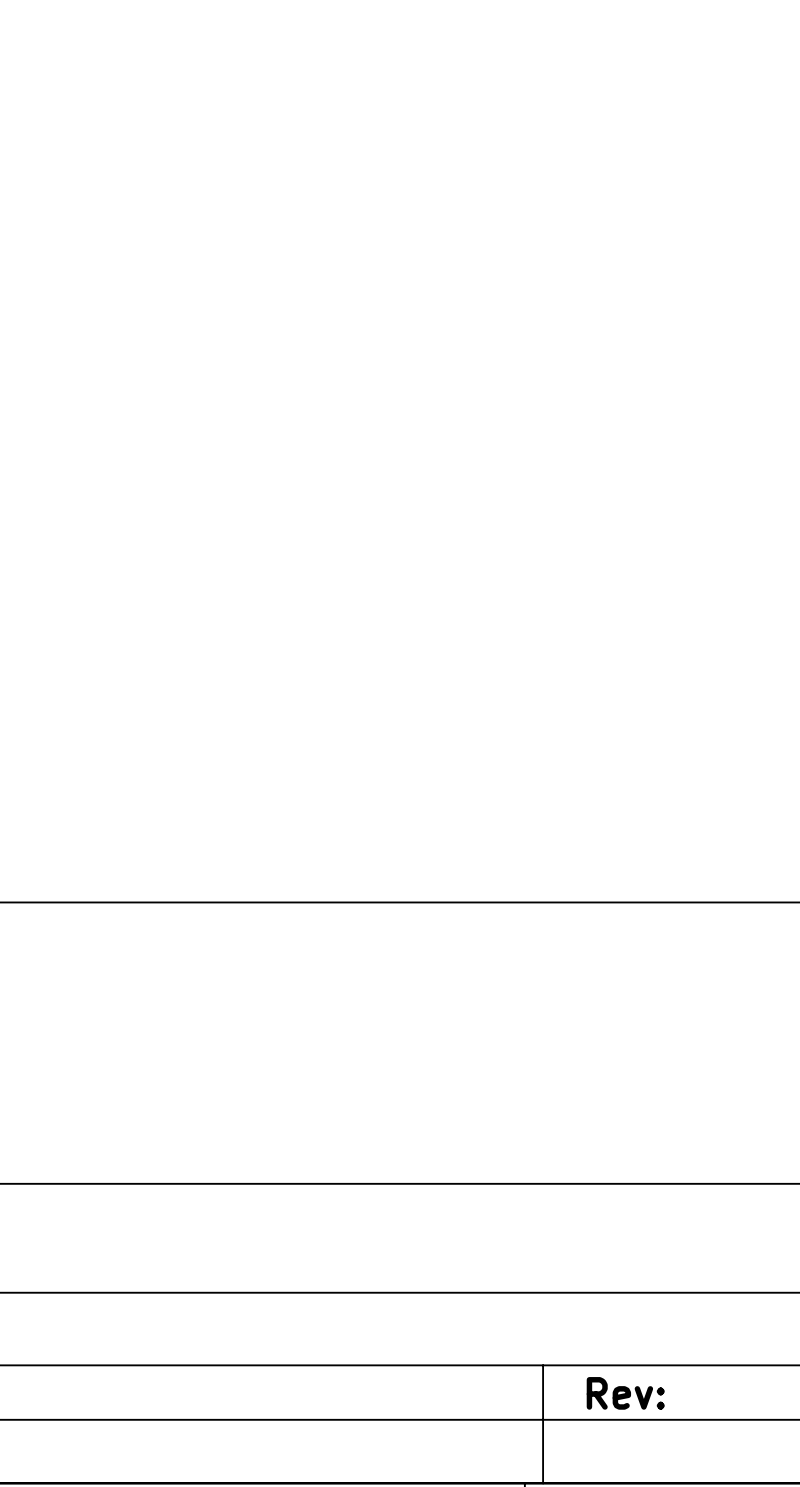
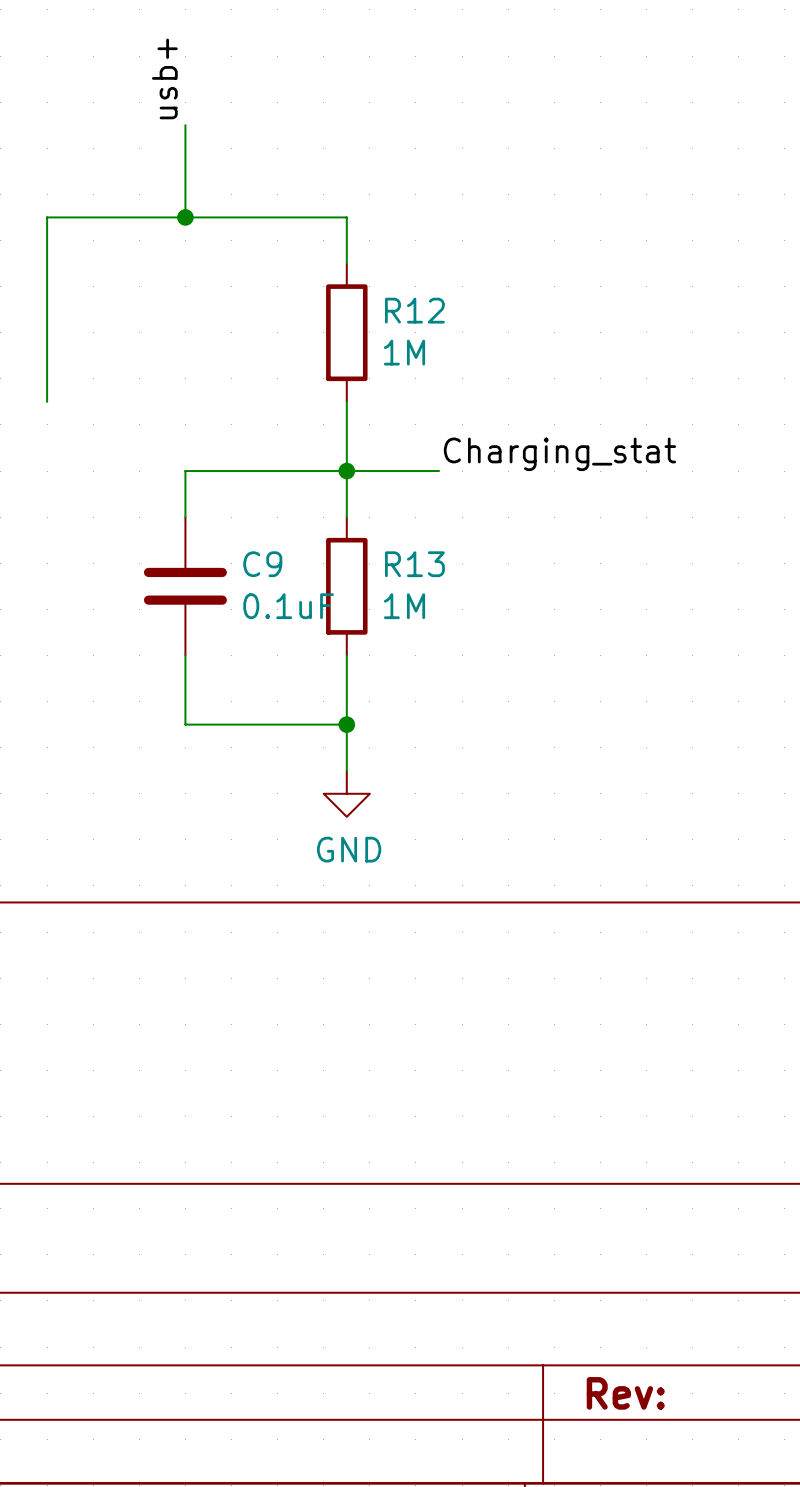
label: none -> usb+ (164, 78)
wire: none -> (185, 125) (185, 217)
junction: none -> (185, 217)
wire: none -> (346, 263) (346, 217) (47, 217) (47, 401)
R12: none -> 1M (346, 332)
wire: none -> (346, 401) (346, 517)
label: none -> Charging_stat (559, 454)
junction: none -> (346, 471)
wire: none -> (439, 471) (185, 471) (185, 517)
C9: none -> 0.1uF (185, 586)
R13: none -> 1M (346, 586)
wire: none -> (185, 655) (185, 724) (346, 724)
wire: none -> (346, 655) (346, 770)
junction: none -> (346, 724)
power symbol: none -> GND (346, 793)

